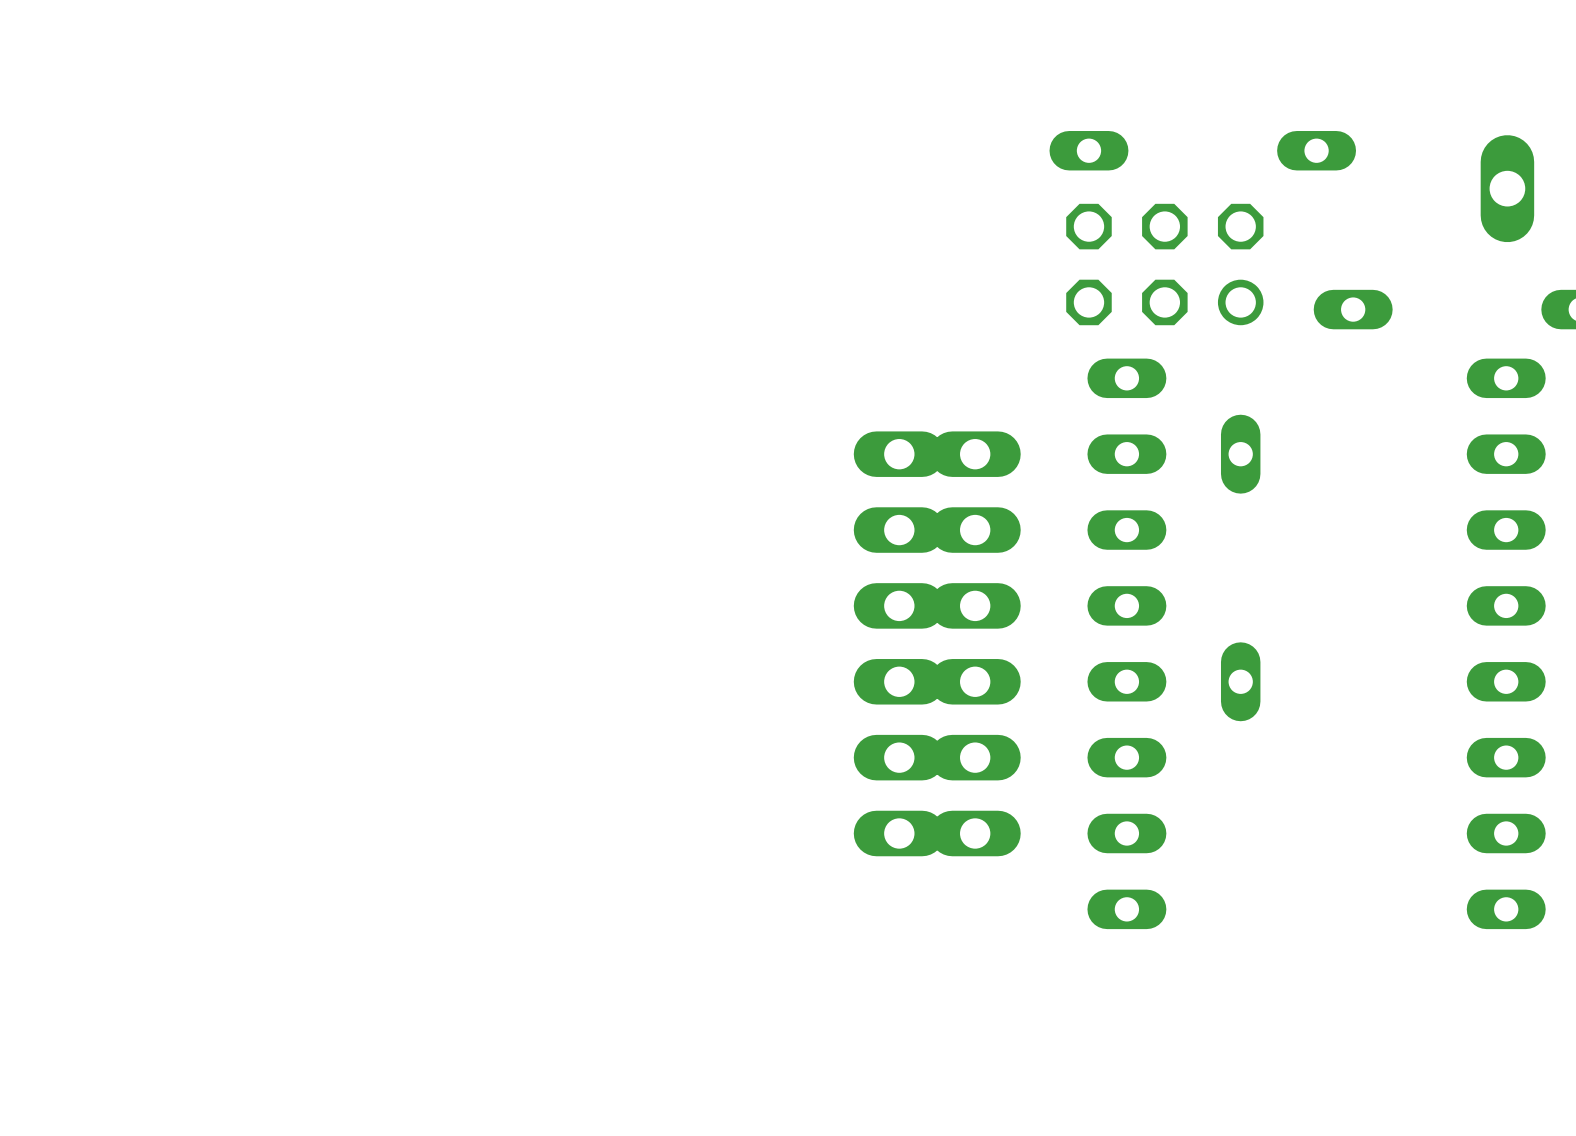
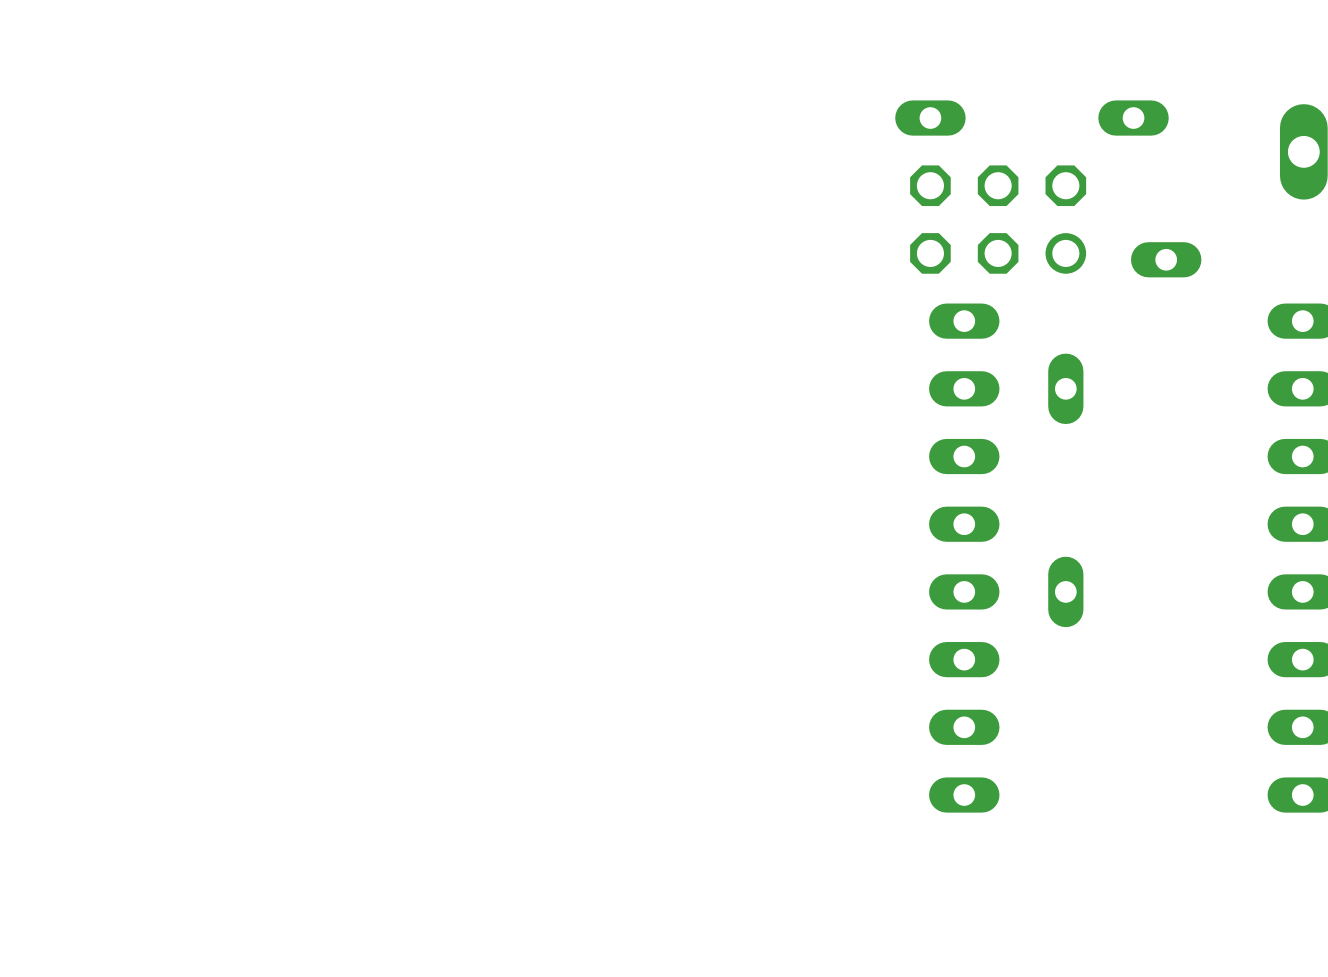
part: (899, 643) -> none
part: (975, 643) -> none

